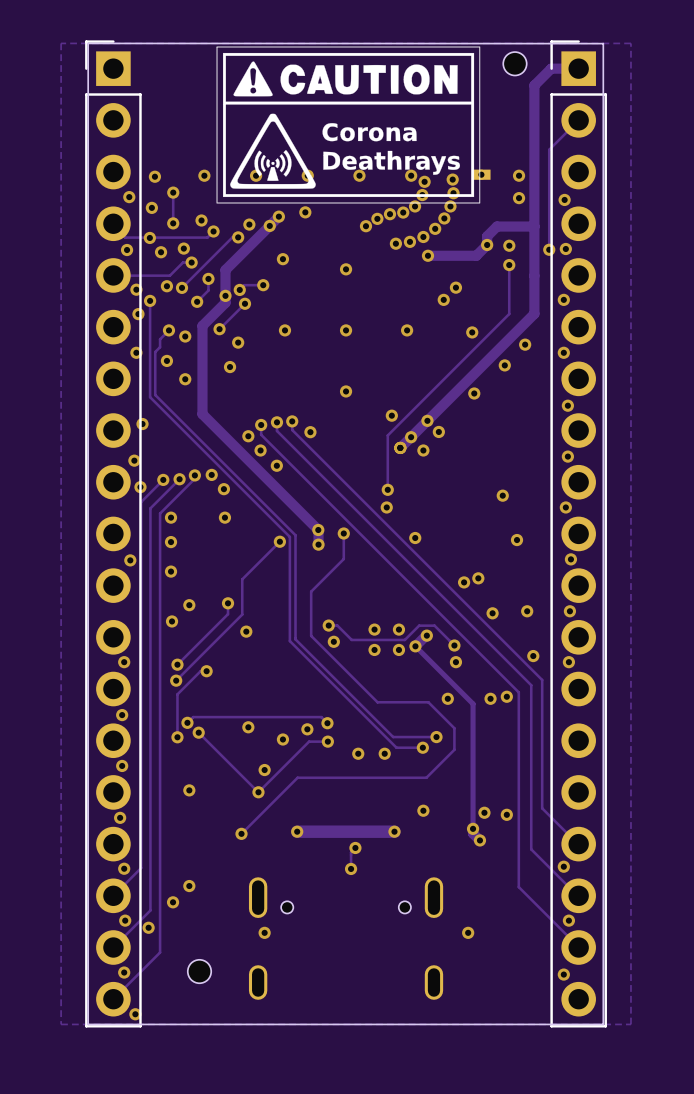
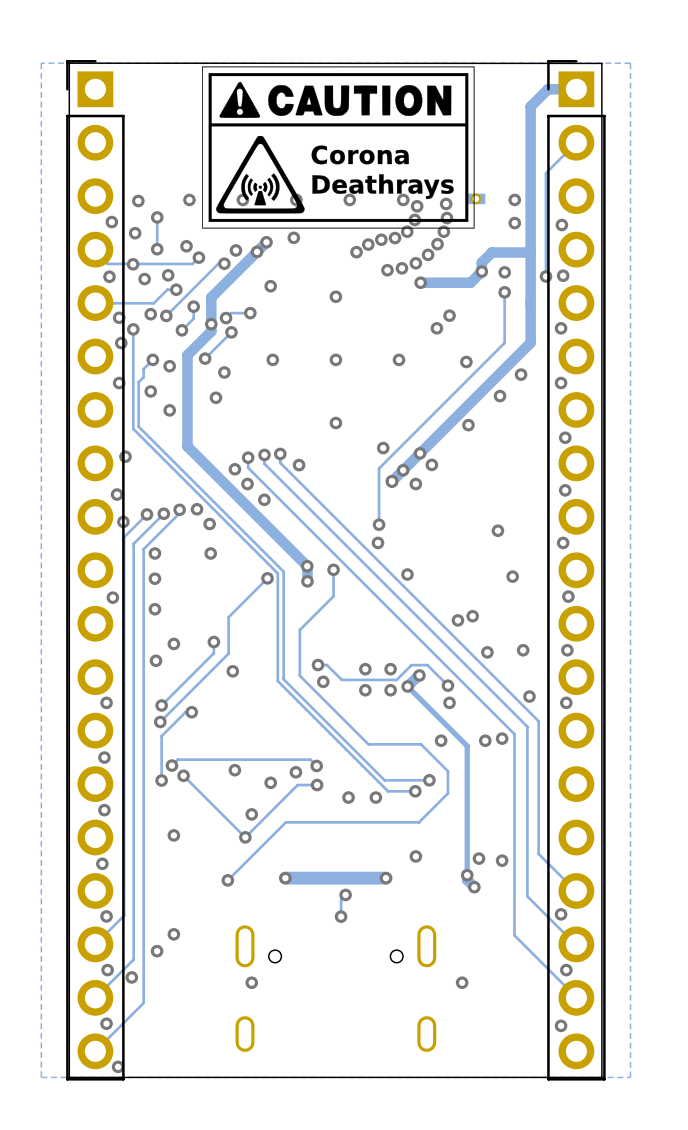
part: (514, 63) -> none
part: (199, 971) -> none

